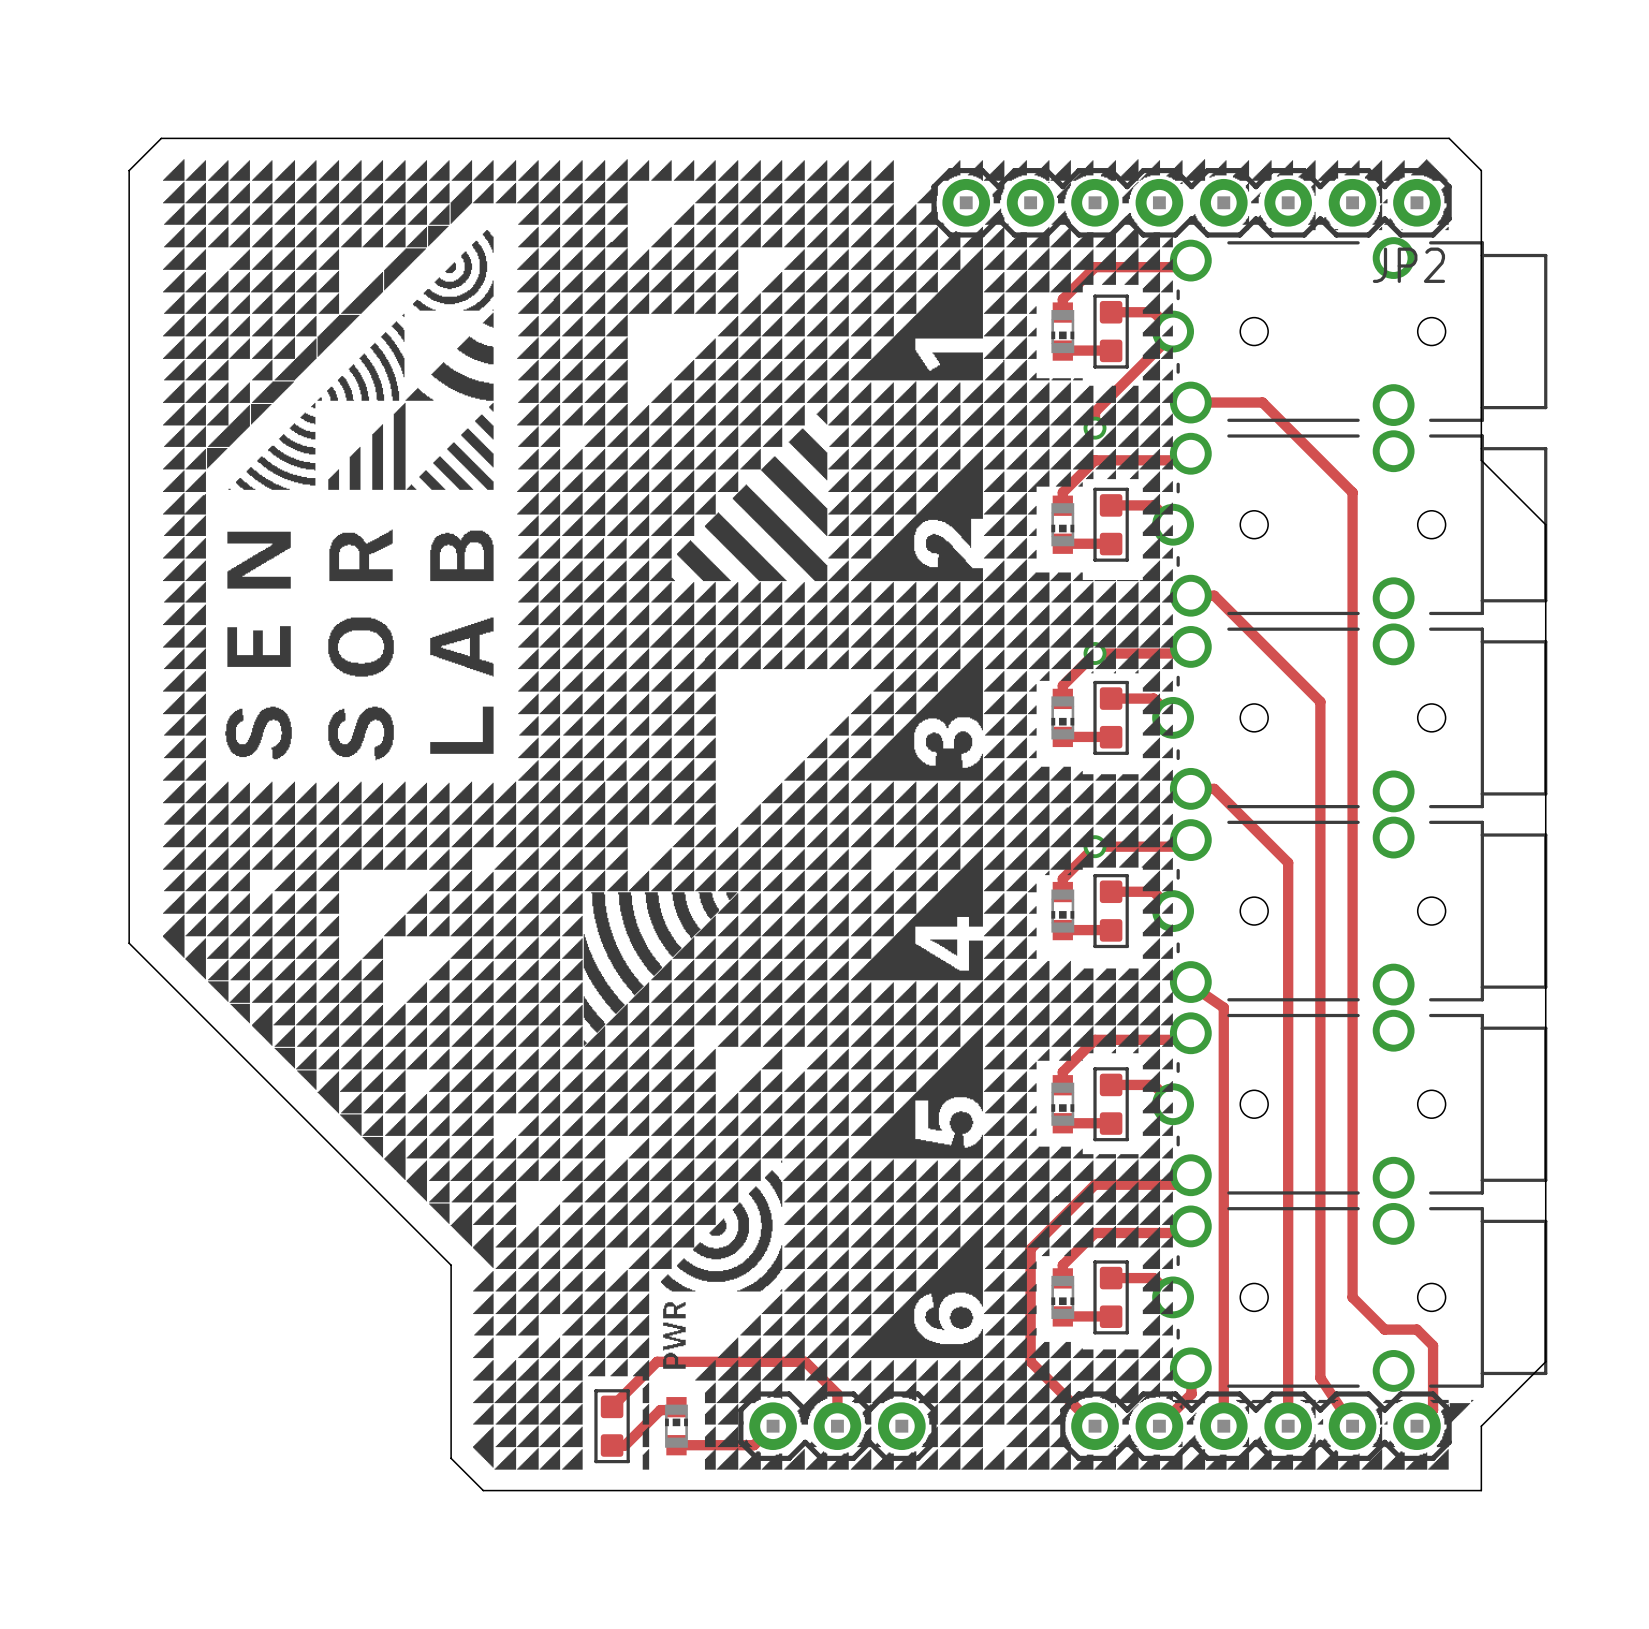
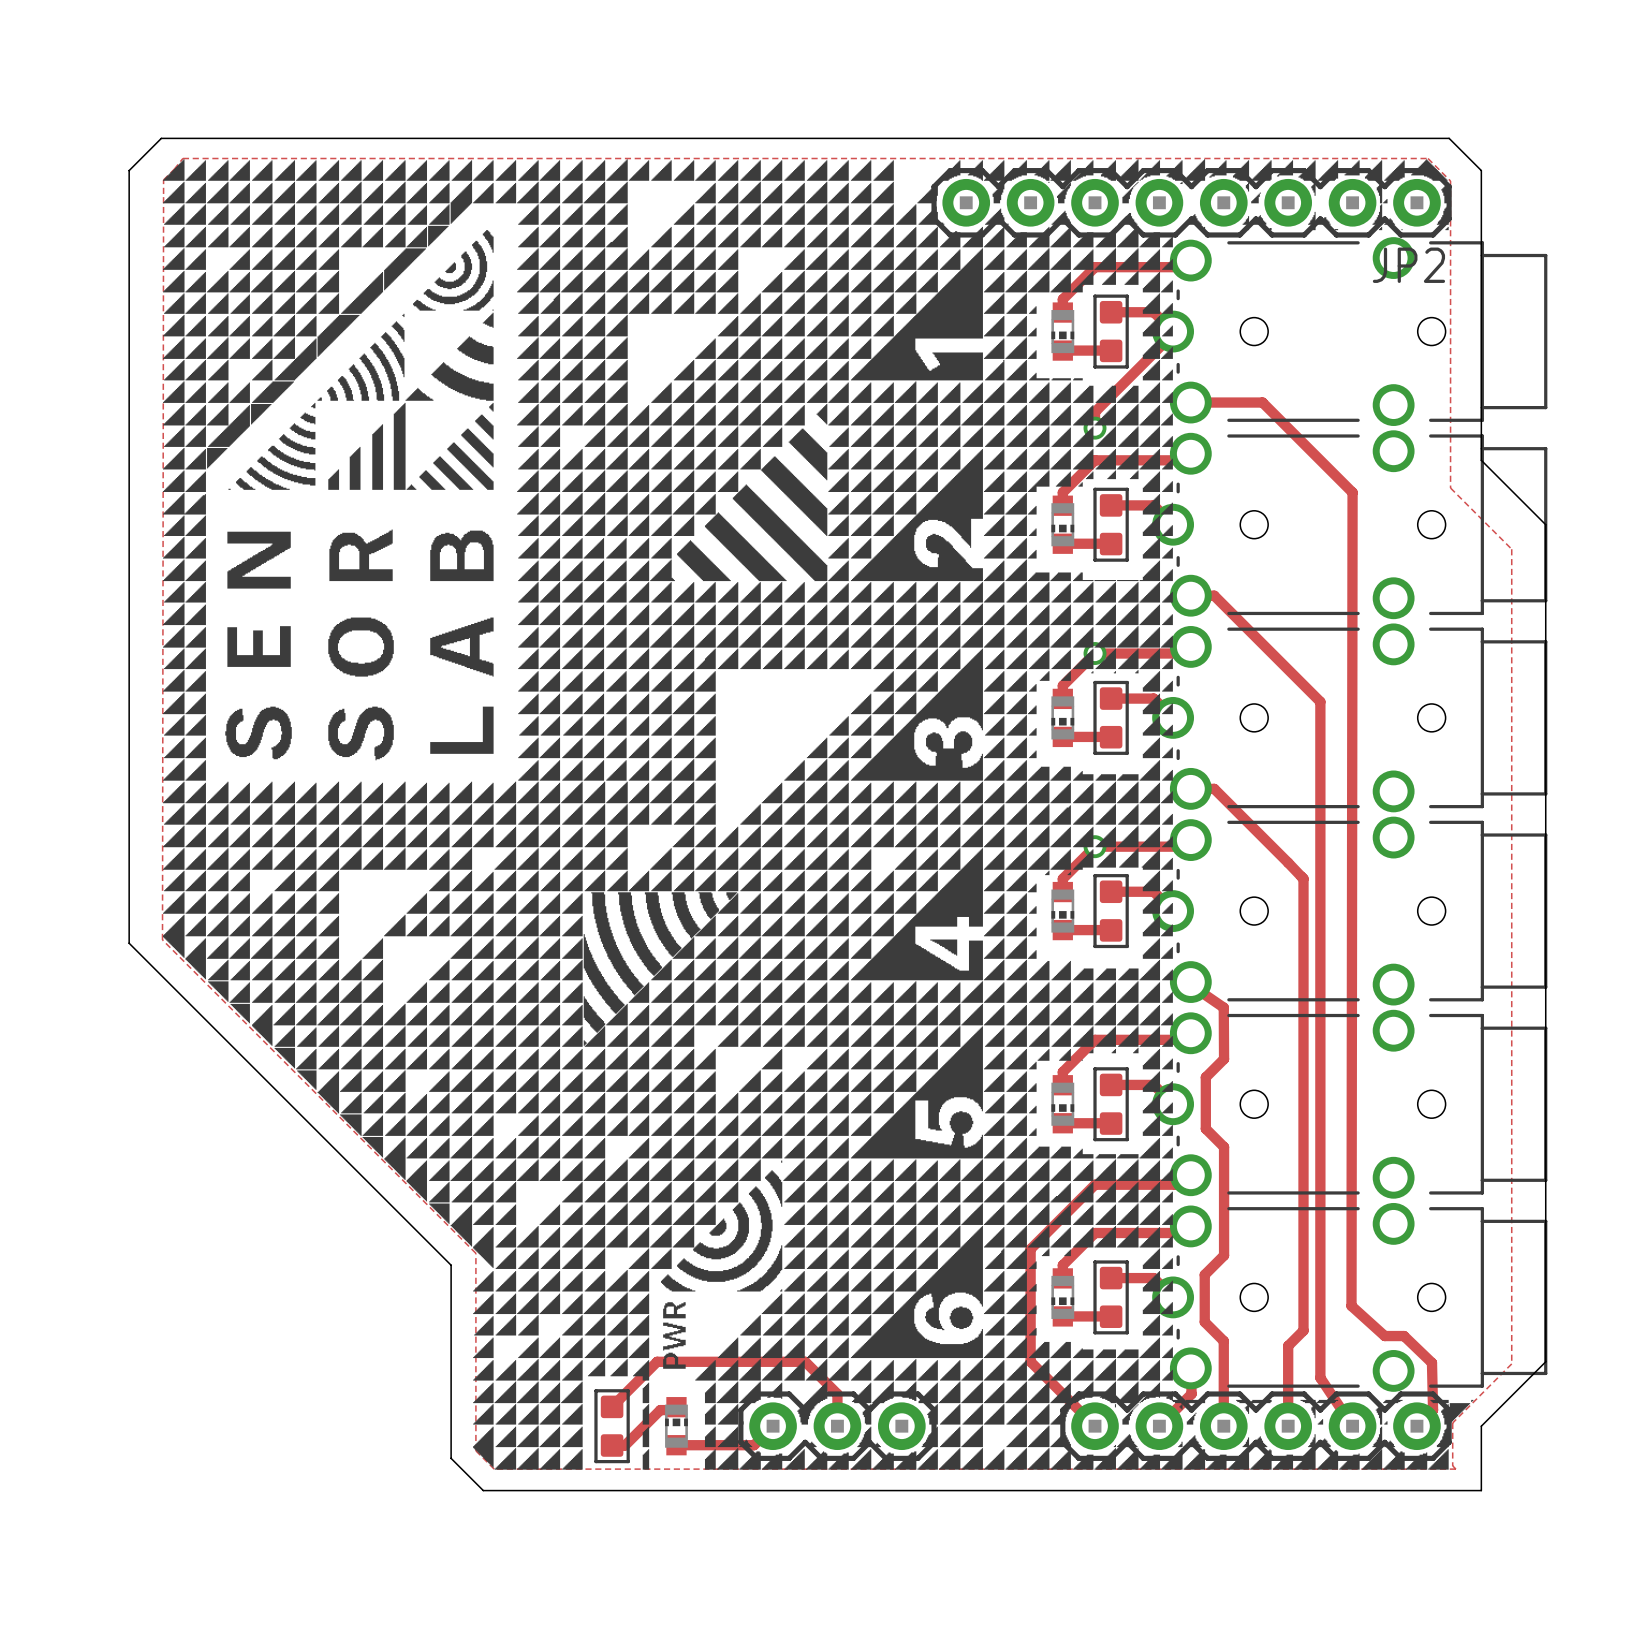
zone outline: none -> (182, 158) (163, 179) (162, 939) (475, 1253) (475, 1450) (494, 1469) (1455, 1469) (1452, 1465) (1452, 1422) (1511, 1363) (1511, 549) (1450, 488) (1450, 181) (1428, 158) (182, 158)
track: (1352, 492) (1352, 1297) (1384, 1329) (1416, 1329) (1433, 1345) (1433, 1410) -> (1352, 492) (1351, 1305) (1384, 1336) (1404, 1336) (1431, 1362) (1433, 1410)
track: (1288, 862) (1288, 1345) -> (1288, 862) (1303, 878) (1303, 1330) (1288, 1345)
track: (1223, 1007) (1223, 1341) -> (1223, 1007) (1224, 1059) (1205, 1077) (1205, 1128) (1224, 1147) (1224, 1255) (1204, 1274) (1204, 1322) (1223, 1341)

